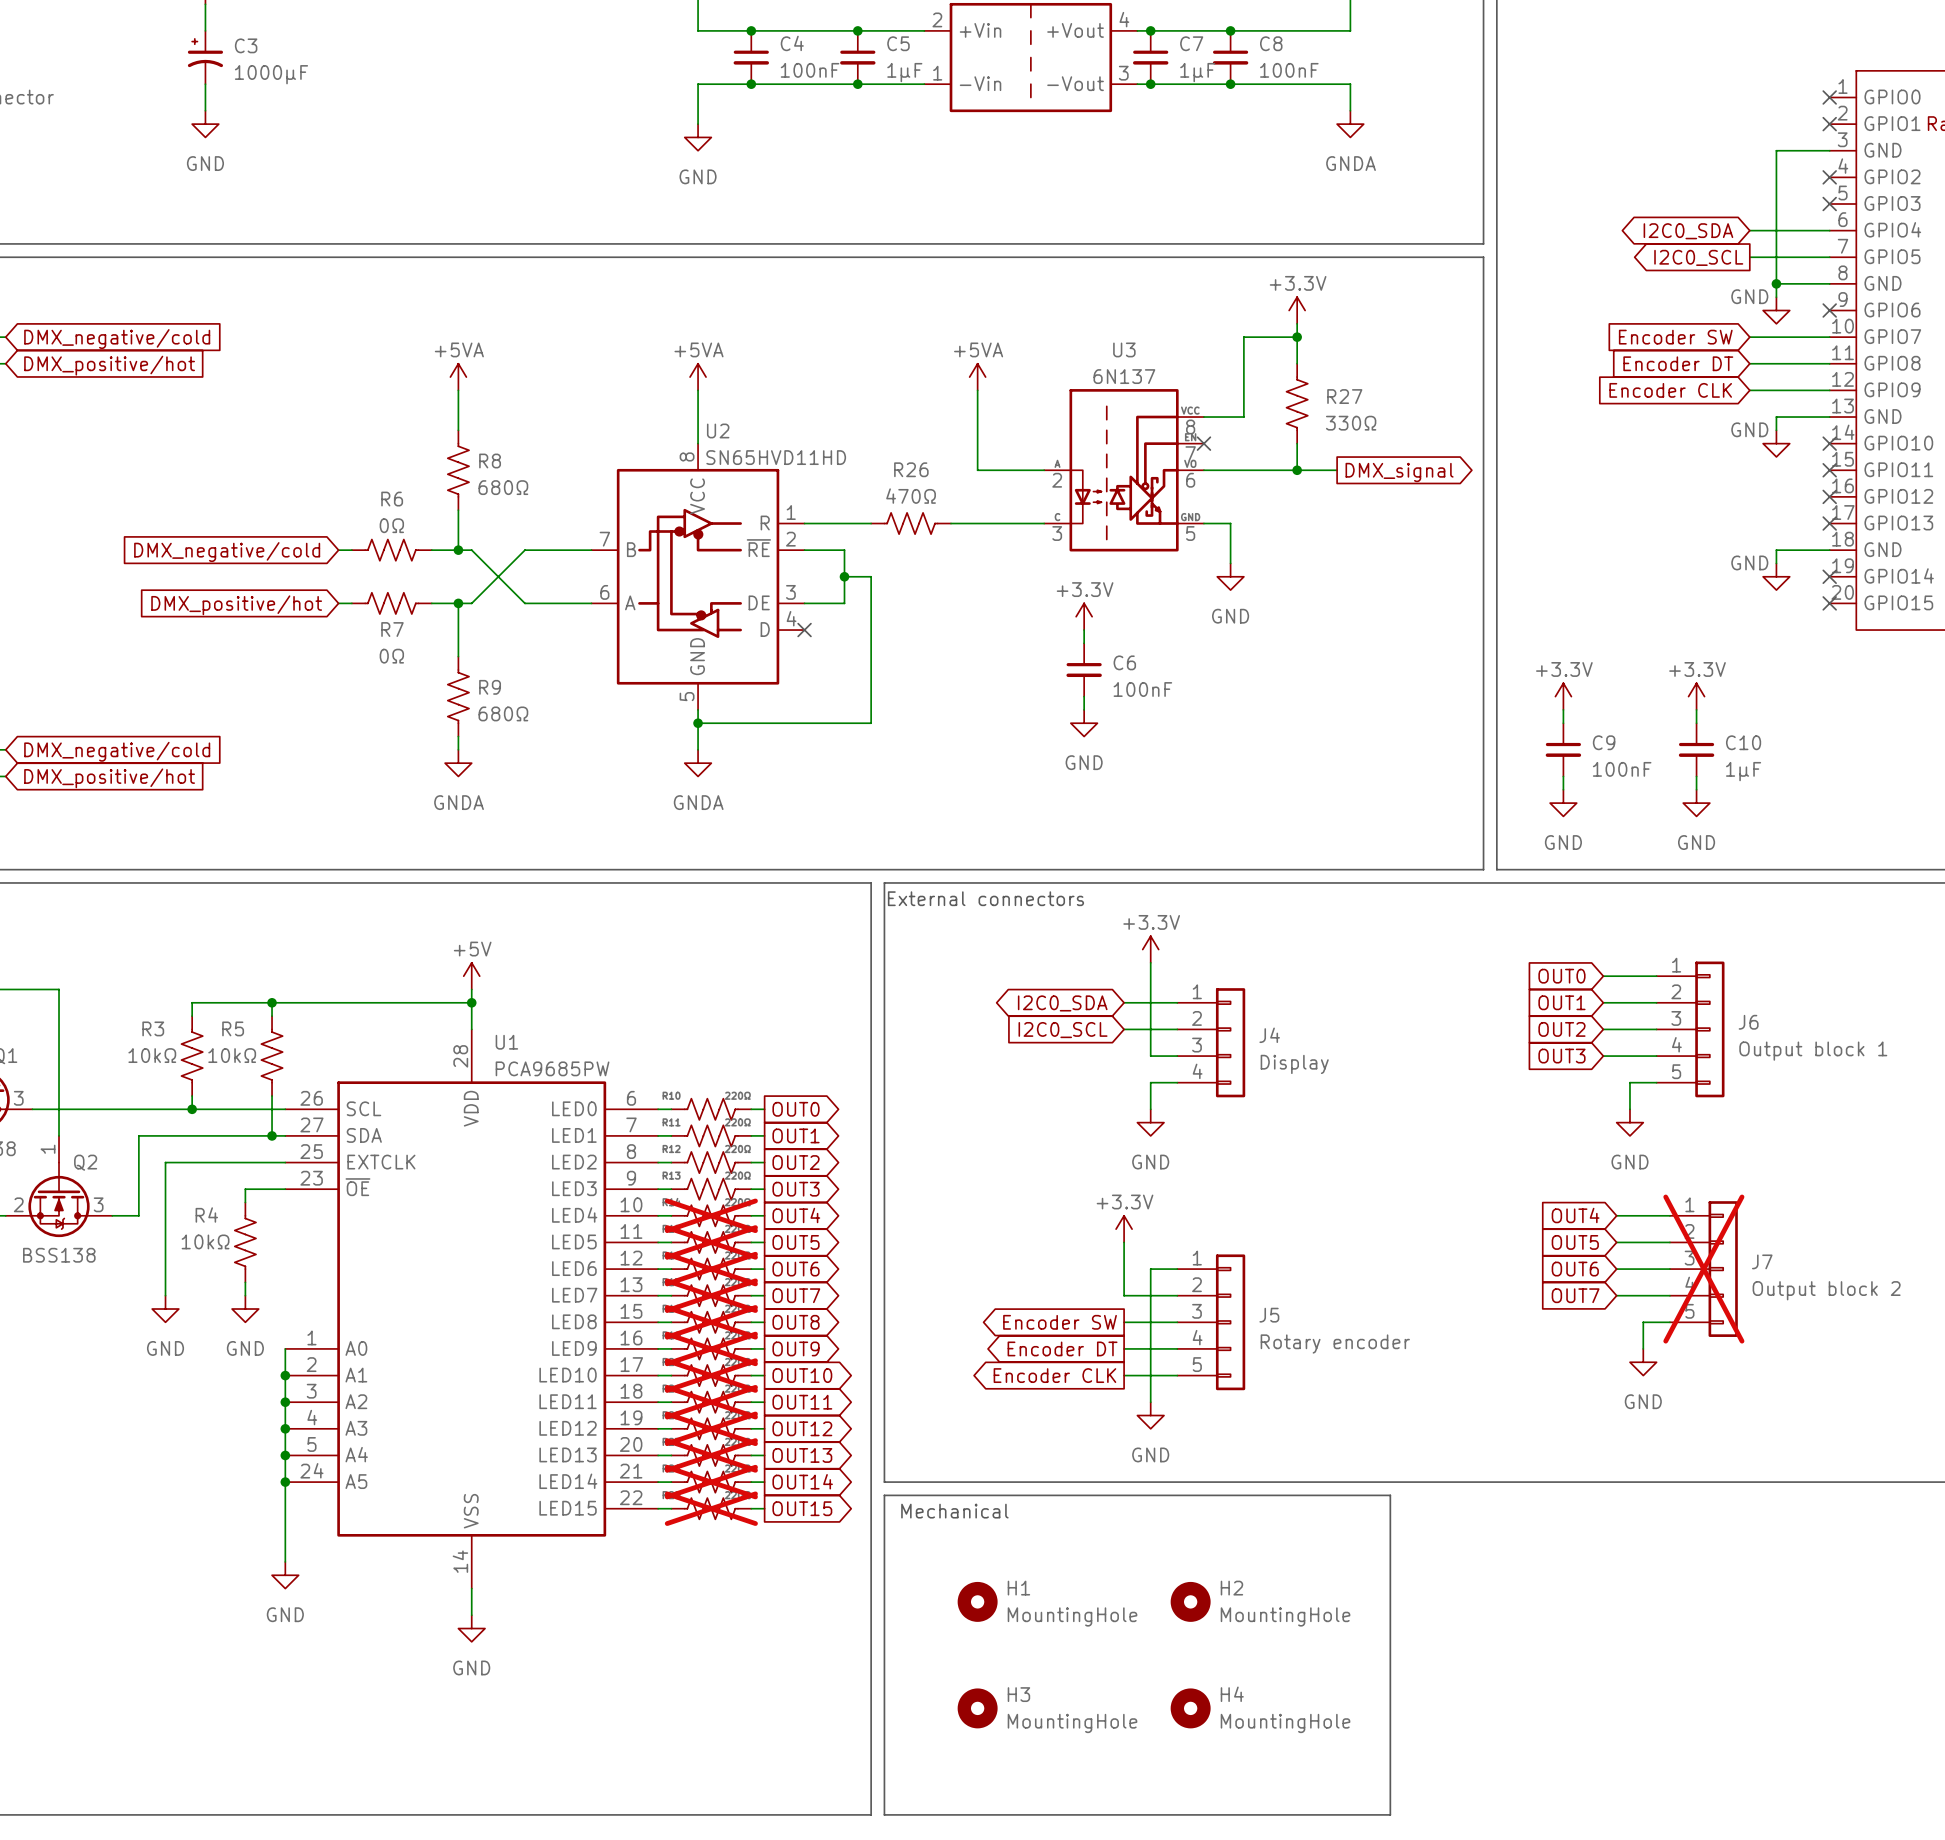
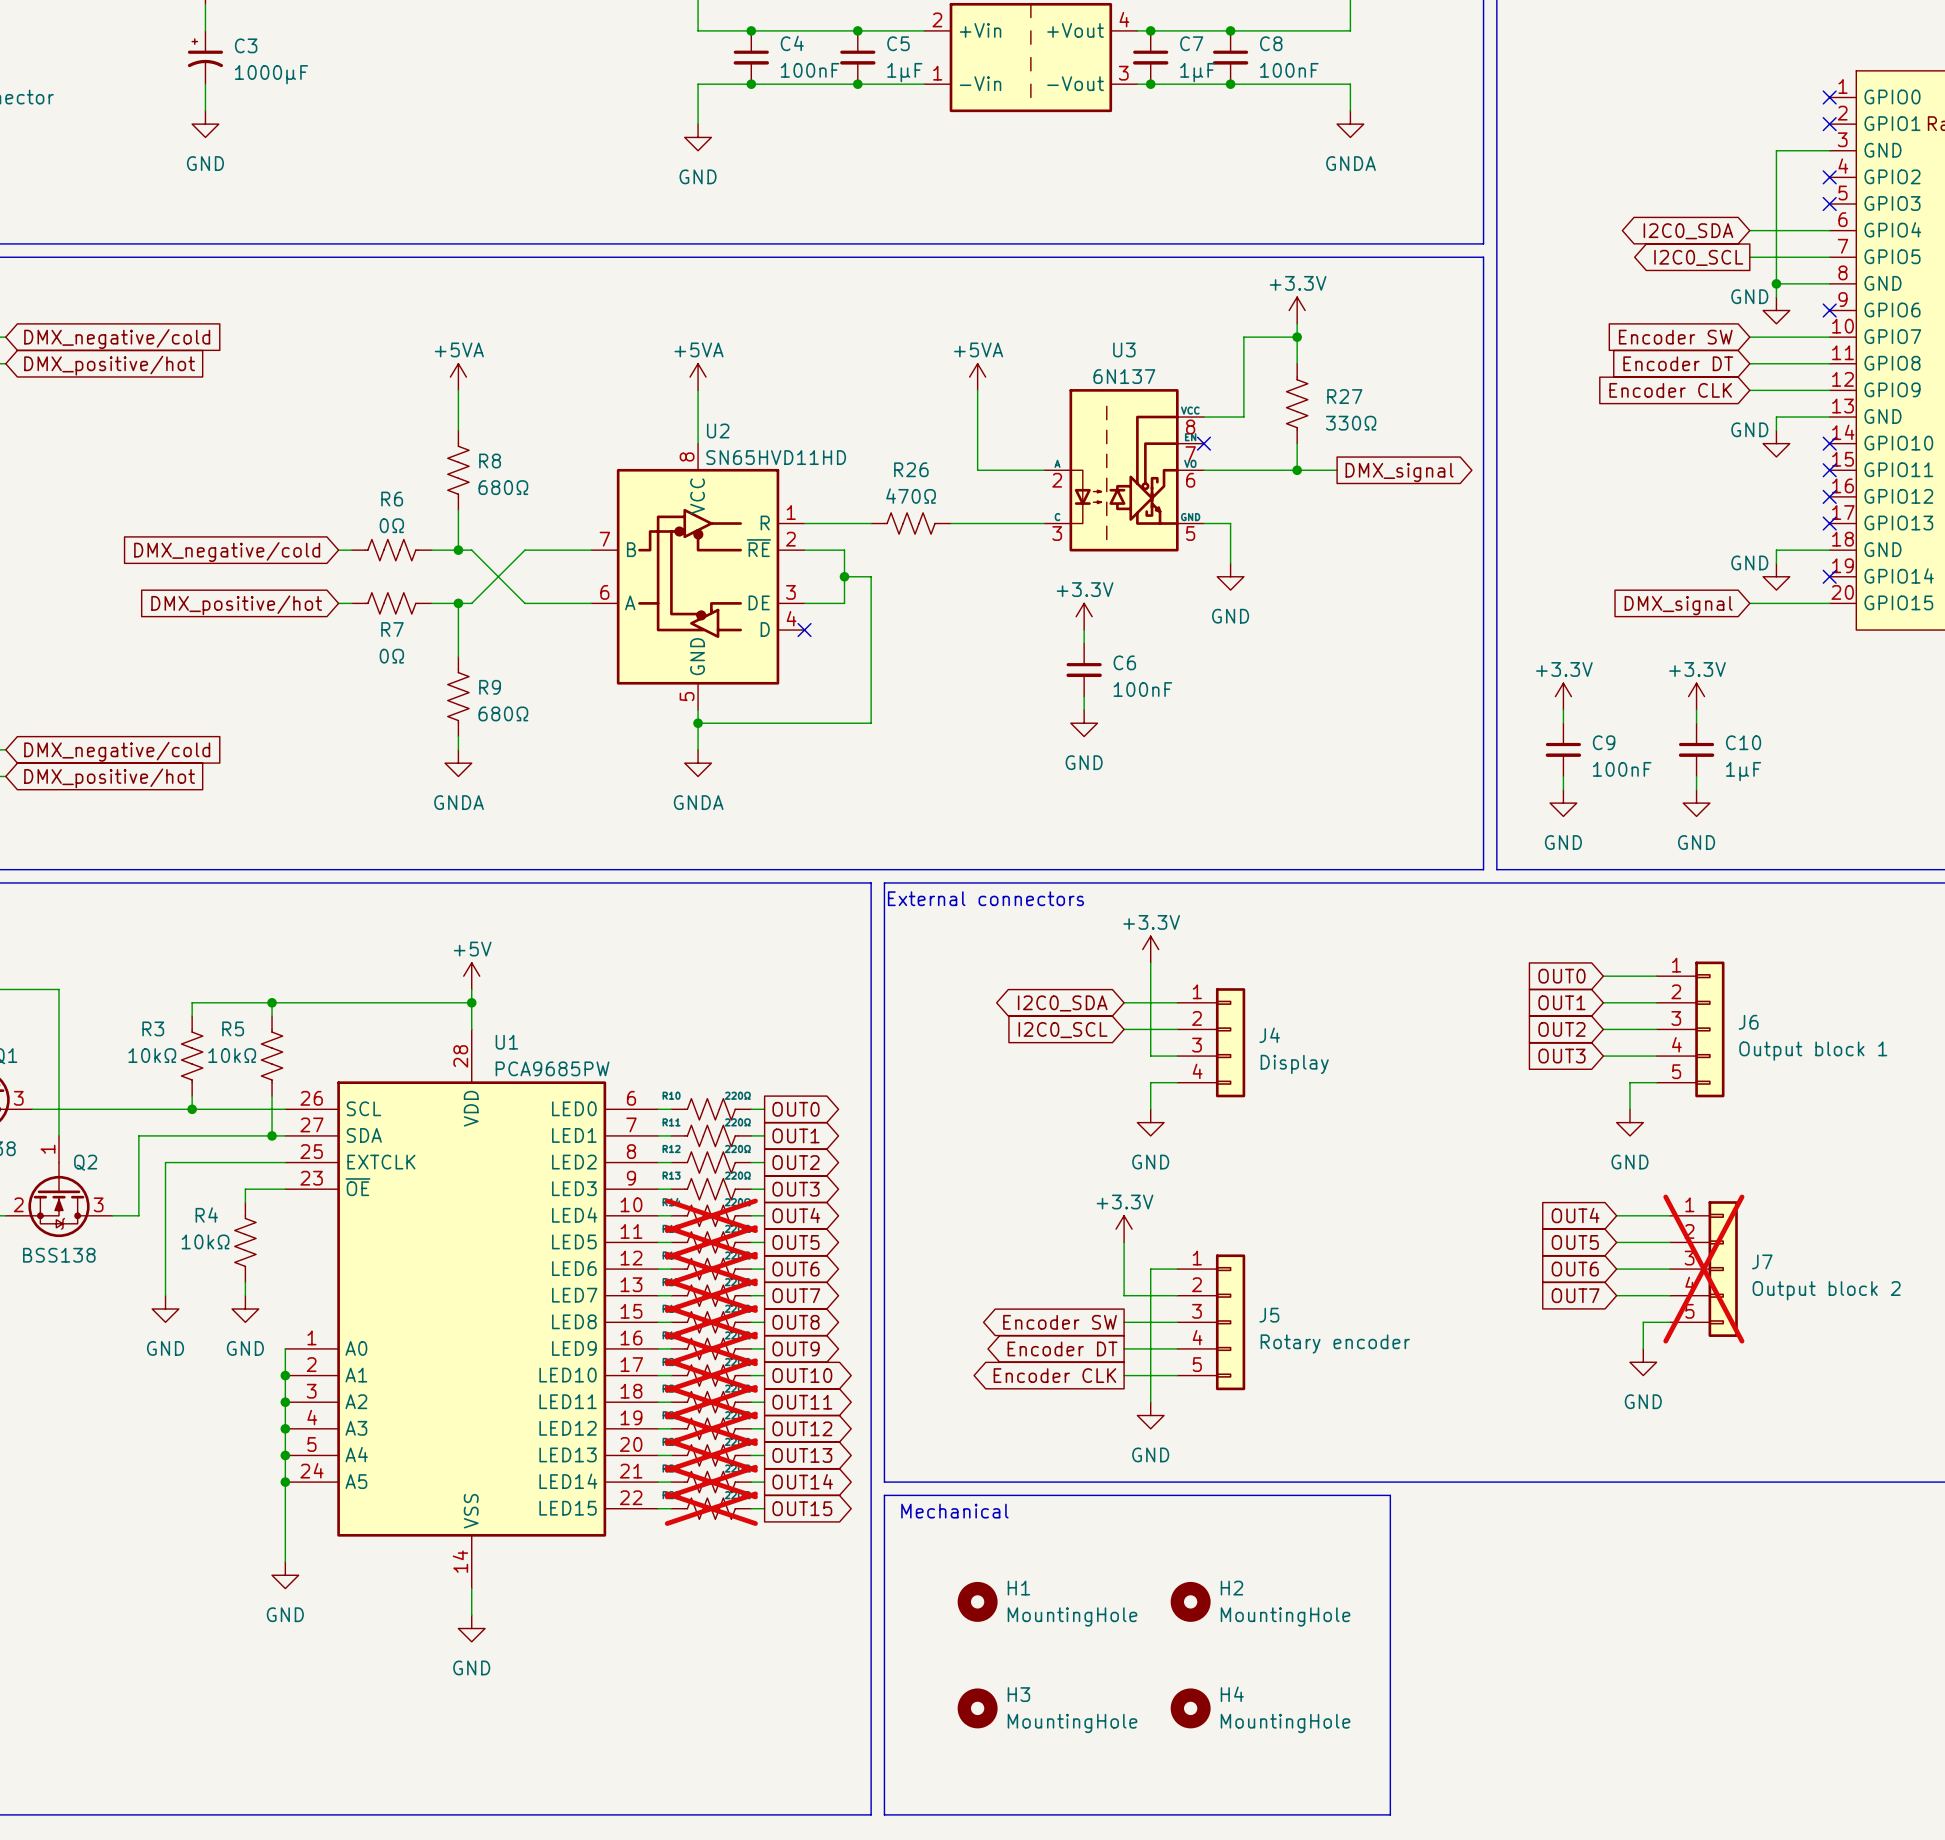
wire: none -> (1749, 603) (1829, 603)
no-connect mark: (1829, 603) -> none
global label: none -> DMX_signal (1678, 605)

